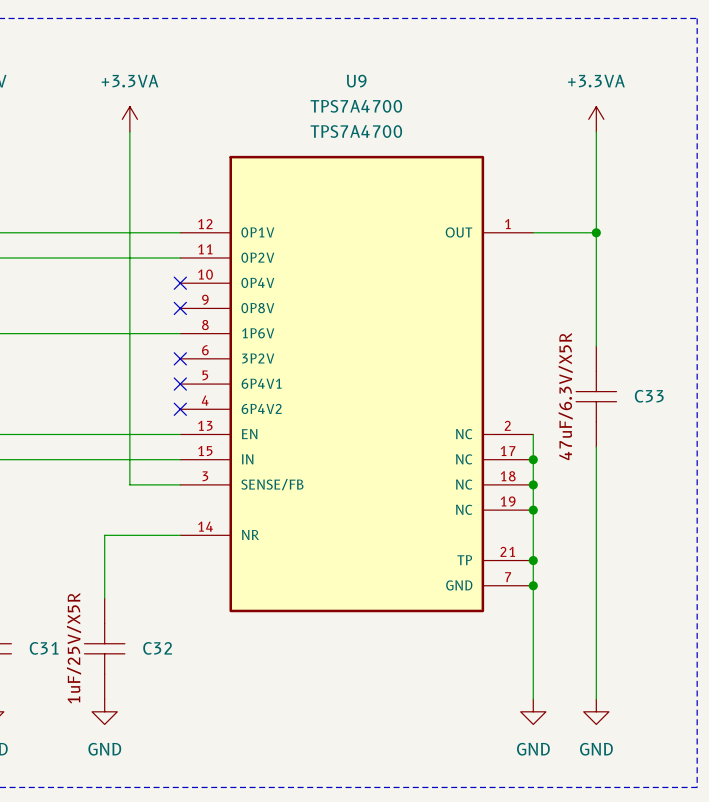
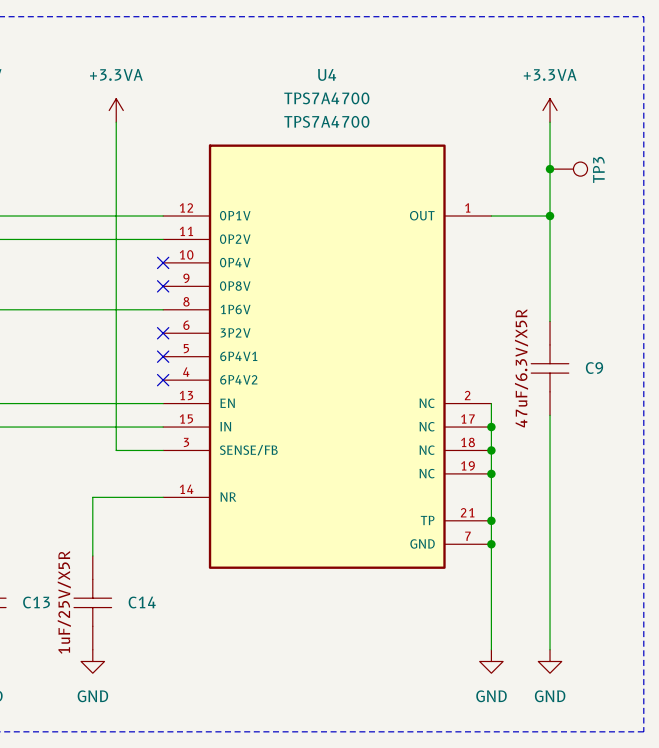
U9 name: U9 (356, 81) -> U4 (327, 74)
junction: none -> (550, 169)
TP3: none -> (568, 169)
C33 name: C33 (649, 396) -> C9 (594, 368)
C31 name: C31 (44, 648) -> C13 (36, 602)
C32 name: C32 (157, 648) -> C14 (142, 602)

